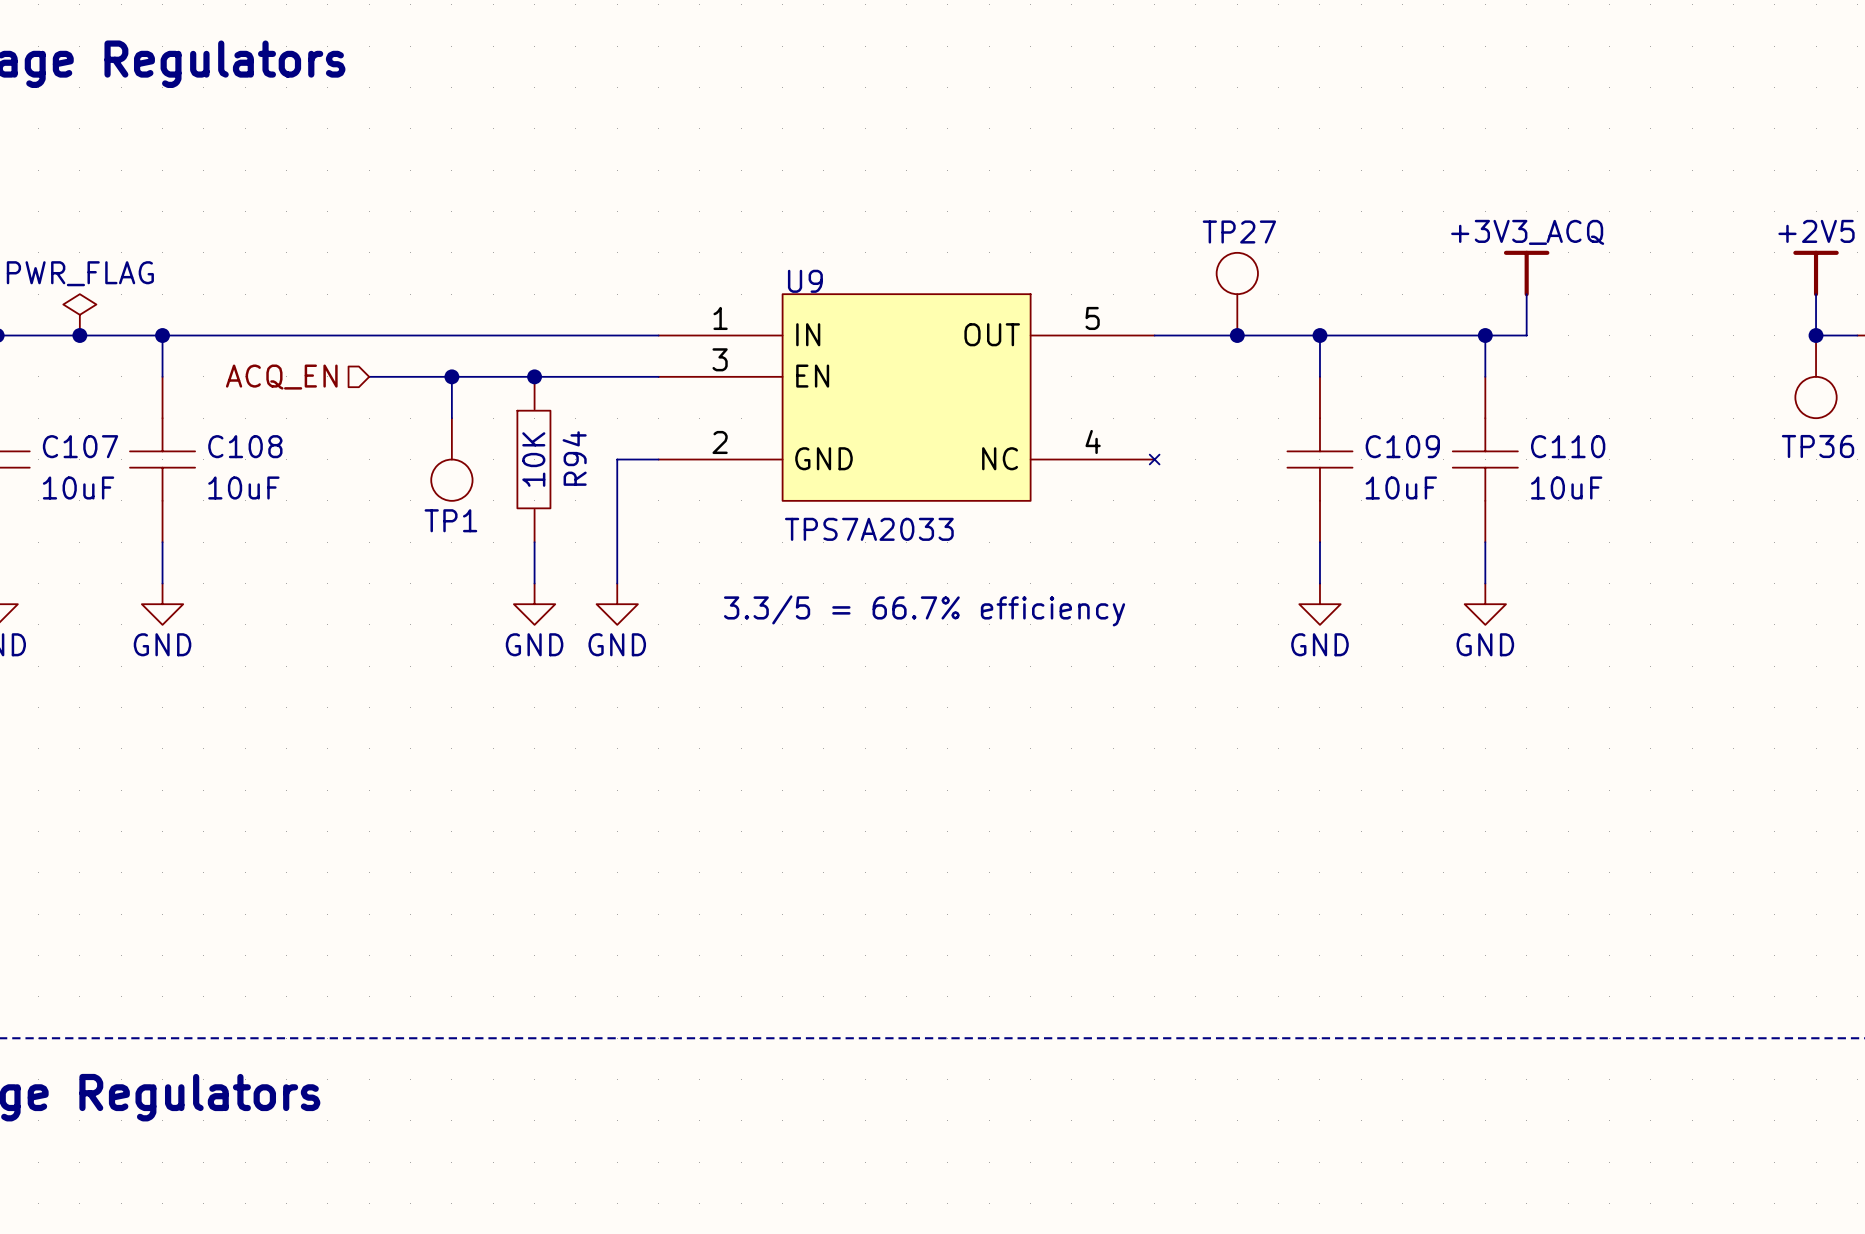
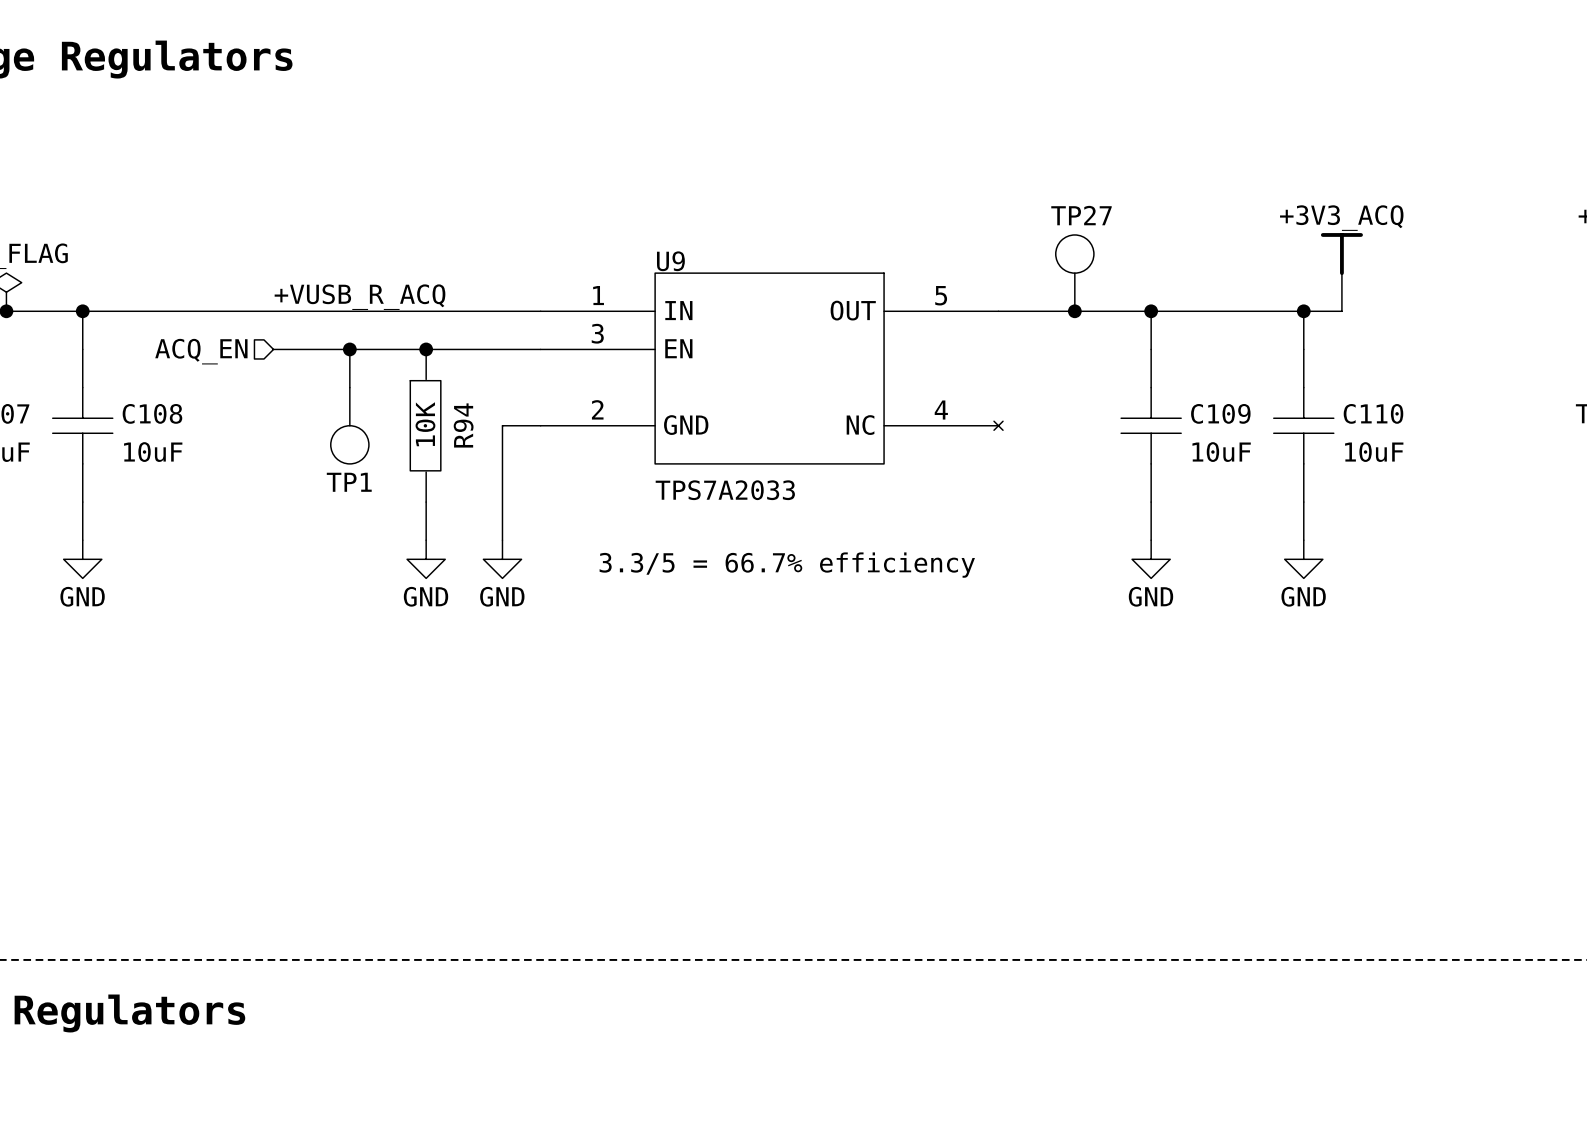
label: none -> +VUSB_R_ACQ (360, 297)

